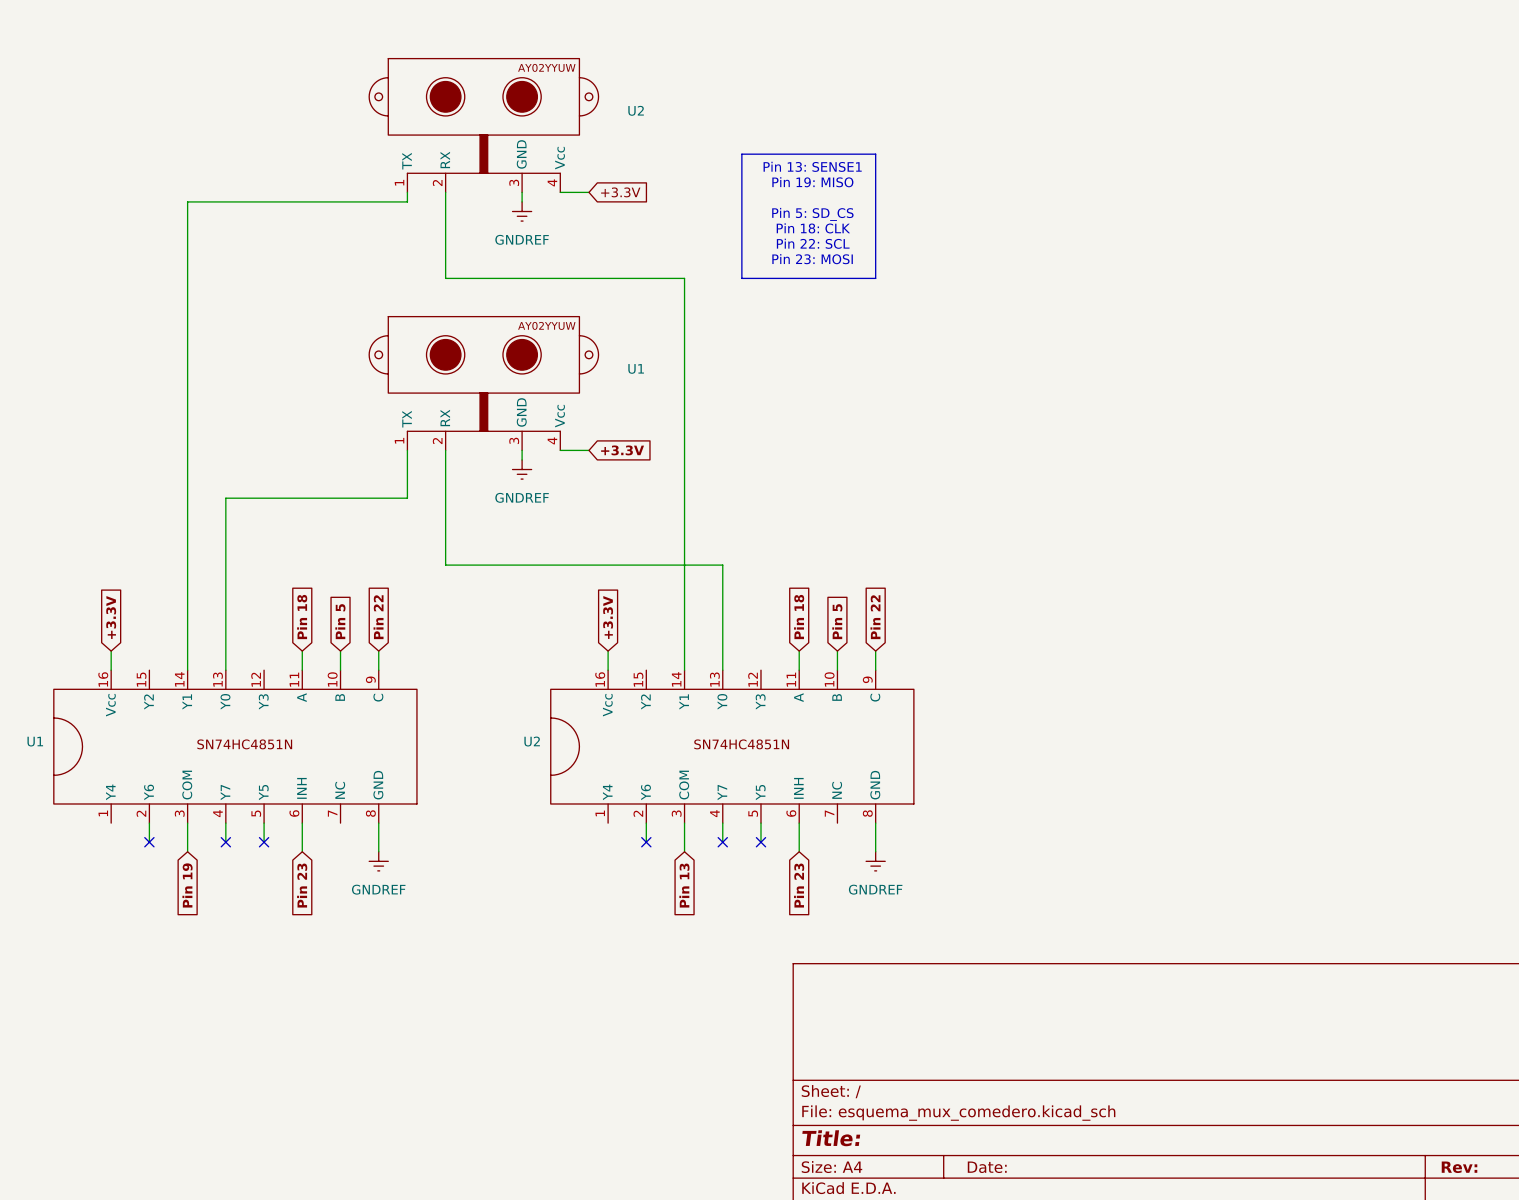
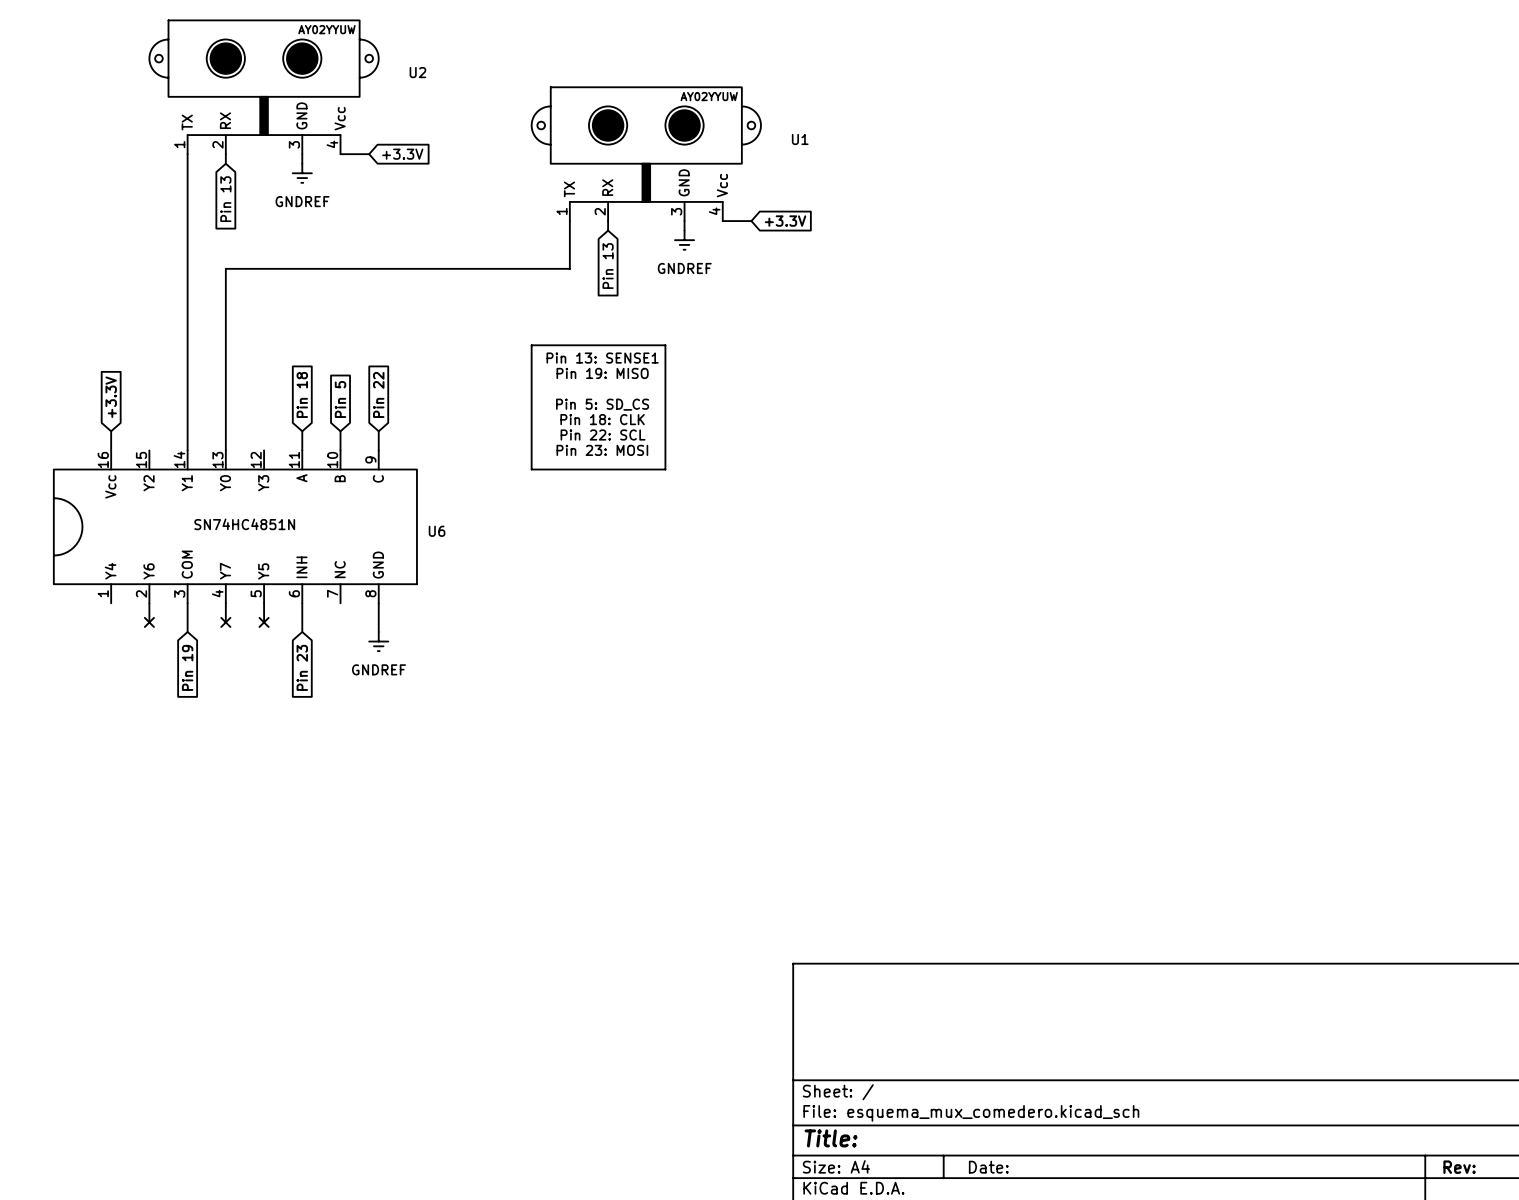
U2: none -> (273, 87)
U2: (493, 125) -> none
wire: none -> (225, 154) (225, 163)
wire: none -> (302, 154) (302, 163)
wire: none -> (340, 154) (369, 154)
global label: none -> +3.3V (402, 154)
U1: none -> (655, 154)
bus: (741, 154) (875, 154) (875, 278) (741, 278) (741, 154) -> none
text: Pin 13: SENSE1 (812, 166) -> none
power symbol: none -> GNDREF (302, 173)
text: Pin 19: MISO (812, 182) -> none
wire: (407, 192) (407, 201) (187, 201) -> (187, 154) (187, 201)
wire: (445, 192) (445, 278) (684, 278) (684, 670) -> none
wire: (522, 192) (522, 201) -> (684, 221) (684, 230)
wire: (560, 192) (588, 192) -> (722, 221) (751, 221)
global label: +3.3V (620, 192) -> none
global label: none -> Pin 13 (225, 199)
power symbol: GNDREF (522, 211) -> none
text: Pin 5: SD_CS (812, 214) -> none
wire: none -> (569, 221) (569, 268) (225, 268) (225, 450)
wire: none -> (608, 221) (608, 230)
global label: none -> +3.3V (785, 221)
text: Pin 18: CLK (813, 228) -> none
power symbol: none -> GNDREF (684, 240)
text: Pin 22: SCL (813, 243) -> none
text: Pin 23: MOSI (812, 259) -> none
global label: none -> Pin 13 (608, 266)
bus: none -> (531, 345) (665, 345) (665, 469) (531, 469) (531, 345)
text: none -> Pin 13: SENSE1 (602, 358)
text: none -> Pin 19: MISO (602, 373)
U1: (493, 383) -> none
global label: none -> +3.3V (111, 397)
global label: none -> Pin 18 (302, 394)
global label: none -> Pin 22 (378, 394)
global label: none -> Pin 5 (340, 399)
text: none -> Pin 5: SD_CS (602, 404)
text: none -> Pin 18: CLK (602, 419)
wire: none -> (111, 431) (111, 450)
wire: none -> (302, 431) (302, 450)
wire: none -> (340, 431) (340, 450)
wire: none -> (378, 431) (378, 450)
text: none -> Pin 22: SCL (603, 434)
wire: (187, 450) (187, 603) -> none
wire: (407, 450) (407, 498) (225, 498) (225, 603) -> none
wire: (445, 450) (445, 565) (722, 565) (722, 670) -> none
wire: (522, 450) (522, 459) -> none
wire: (560, 450) (588, 450) -> none
text: none -> Pin 23: MOSI (602, 450)
global label: +3.3V (622, 450) -> none
power symbol: GNDREF (522, 469) -> none
U6: none -> (235, 526)
wire: none -> (302, 603) (302, 631)
wire: none -> (378, 603) (378, 631)
global label: +3.3V (111, 617) -> none
global label: Pin 18 (302, 617) -> Pin 23 (302, 667)
global label: Pin 22 (378, 617) -> none
global label: +3.3V (608, 617) -> none
global label: Pin 18 (799, 617) -> none
global label: Pin 22 (875, 617) -> none
global label: Pin 5 (340, 621) -> none
global label: Pin 5 (837, 621) -> none
no-connect mark: none -> (149, 622)
wire: (225, 622) (225, 670) -> none
no-connect mark: none -> (225, 622)
no-connect mark: none -> (264, 622)
wire: (187, 631) (187, 670) -> none
power symbol: none -> GNDREF (378, 641)
wire: (111, 651) (111, 670) -> (149, 603) (149, 622)
wire: (302, 651) (302, 670) -> (264, 603) (264, 622)
wire: (340, 651) (340, 670) -> none
wire: (378, 651) (378, 670) -> none
wire: (608, 651) (608, 670) -> none
wire: (799, 651) (799, 670) -> none
wire: (837, 651) (837, 670) -> none
wire: (875, 651) (875, 670) -> none
global label: none -> Pin 19 (187, 667)
U1: (235, 746) -> none
U2: (732, 746) -> none
wire: (149, 823) (149, 842) -> none
wire: (187, 823) (187, 851) -> none
wire: (225, 823) (225, 842) -> none
wire: (264, 823) (264, 842) -> none
wire: (302, 823) (302, 851) -> none
wire: (378, 823) (378, 851) -> none
wire: (646, 823) (646, 842) -> none
wire: (684, 823) (684, 851) -> none
wire: (722, 823) (722, 842) -> none
wire: (760, 823) (760, 842) -> none
wire: (799, 823) (799, 851) -> none
wire: (875, 823) (875, 851) -> none
no-connect mark: (149, 842) -> none
no-connect mark: (225, 842) -> none
no-connect mark: (264, 842) -> none
no-connect mark: (646, 842) -> none
no-connect mark: (722, 842) -> none
no-connect mark: (760, 842) -> none
power symbol: GNDREF (378, 861) -> none
power symbol: GNDREF (875, 861) -> none
global label: Pin 19 (187, 885) -> none
global label: Pin 23 (302, 885) -> none
global label: Pin 13 (684, 885) -> none
global label: Pin 23 (799, 885) -> none

